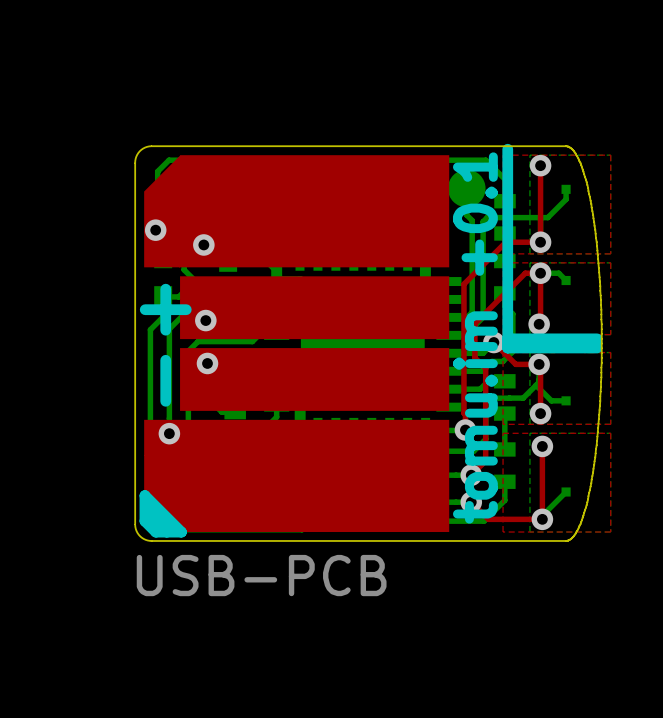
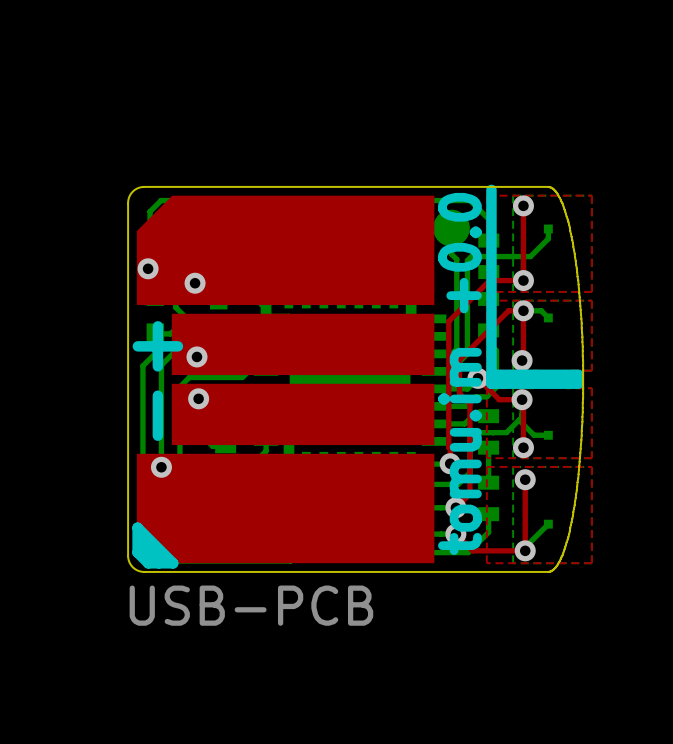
text: tomu.im +0.1 (475, 337) -> tomu.im +0.0 (459, 373)

